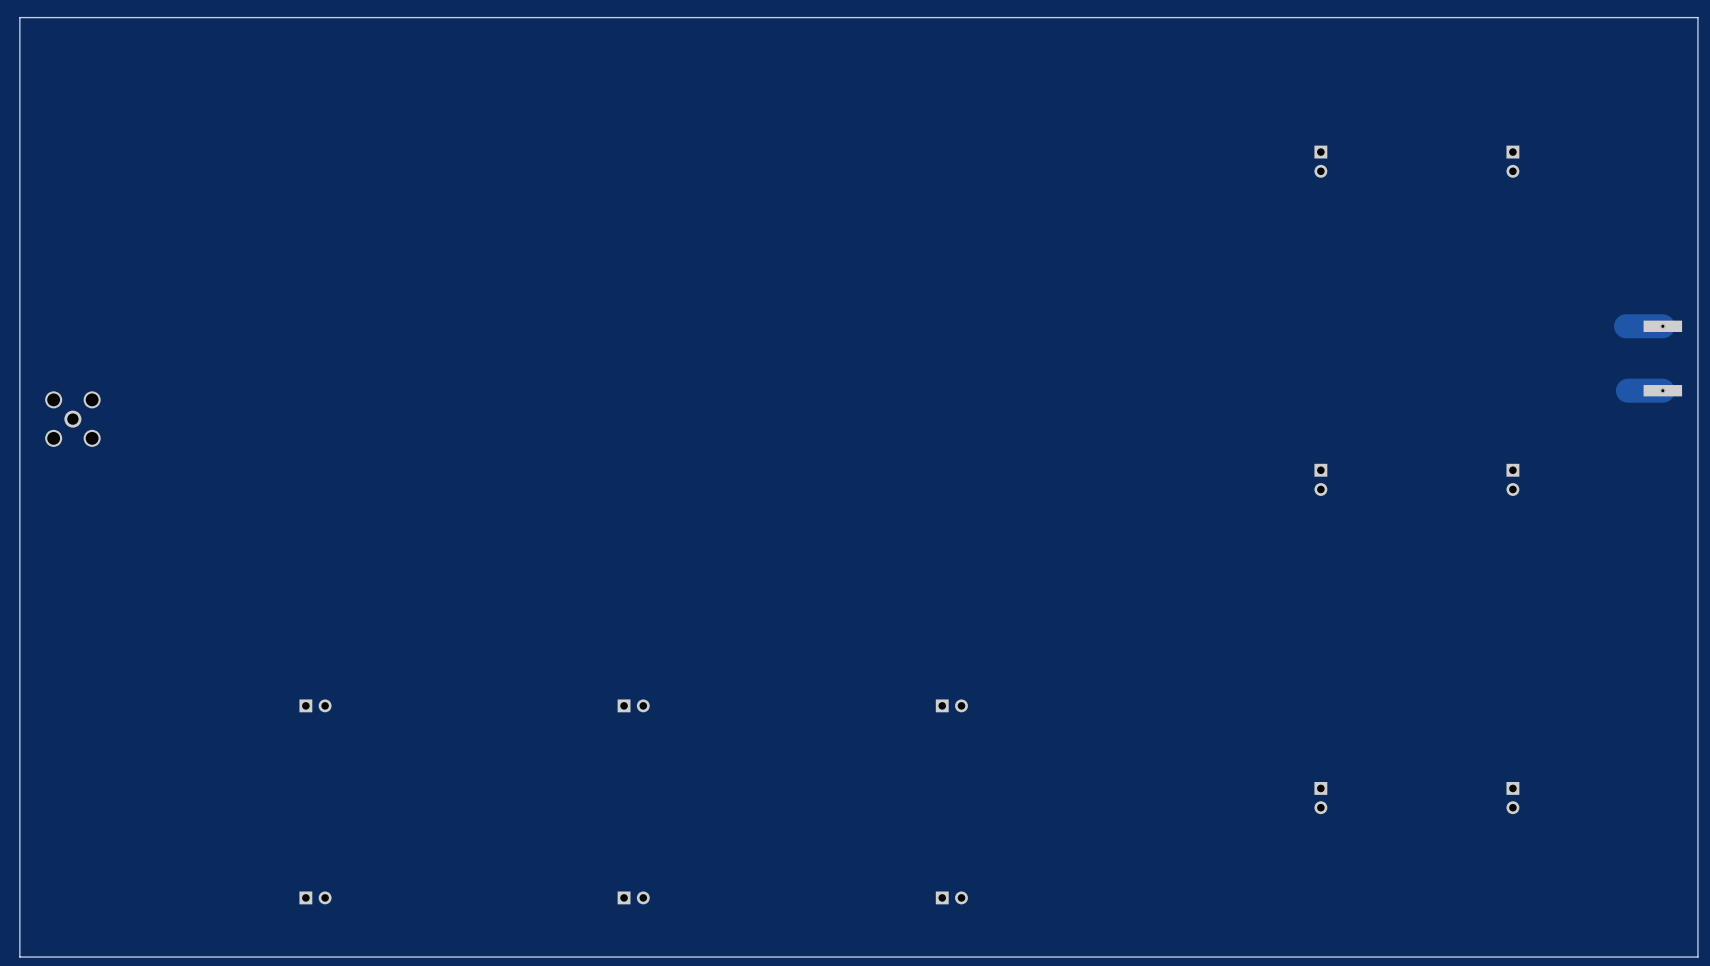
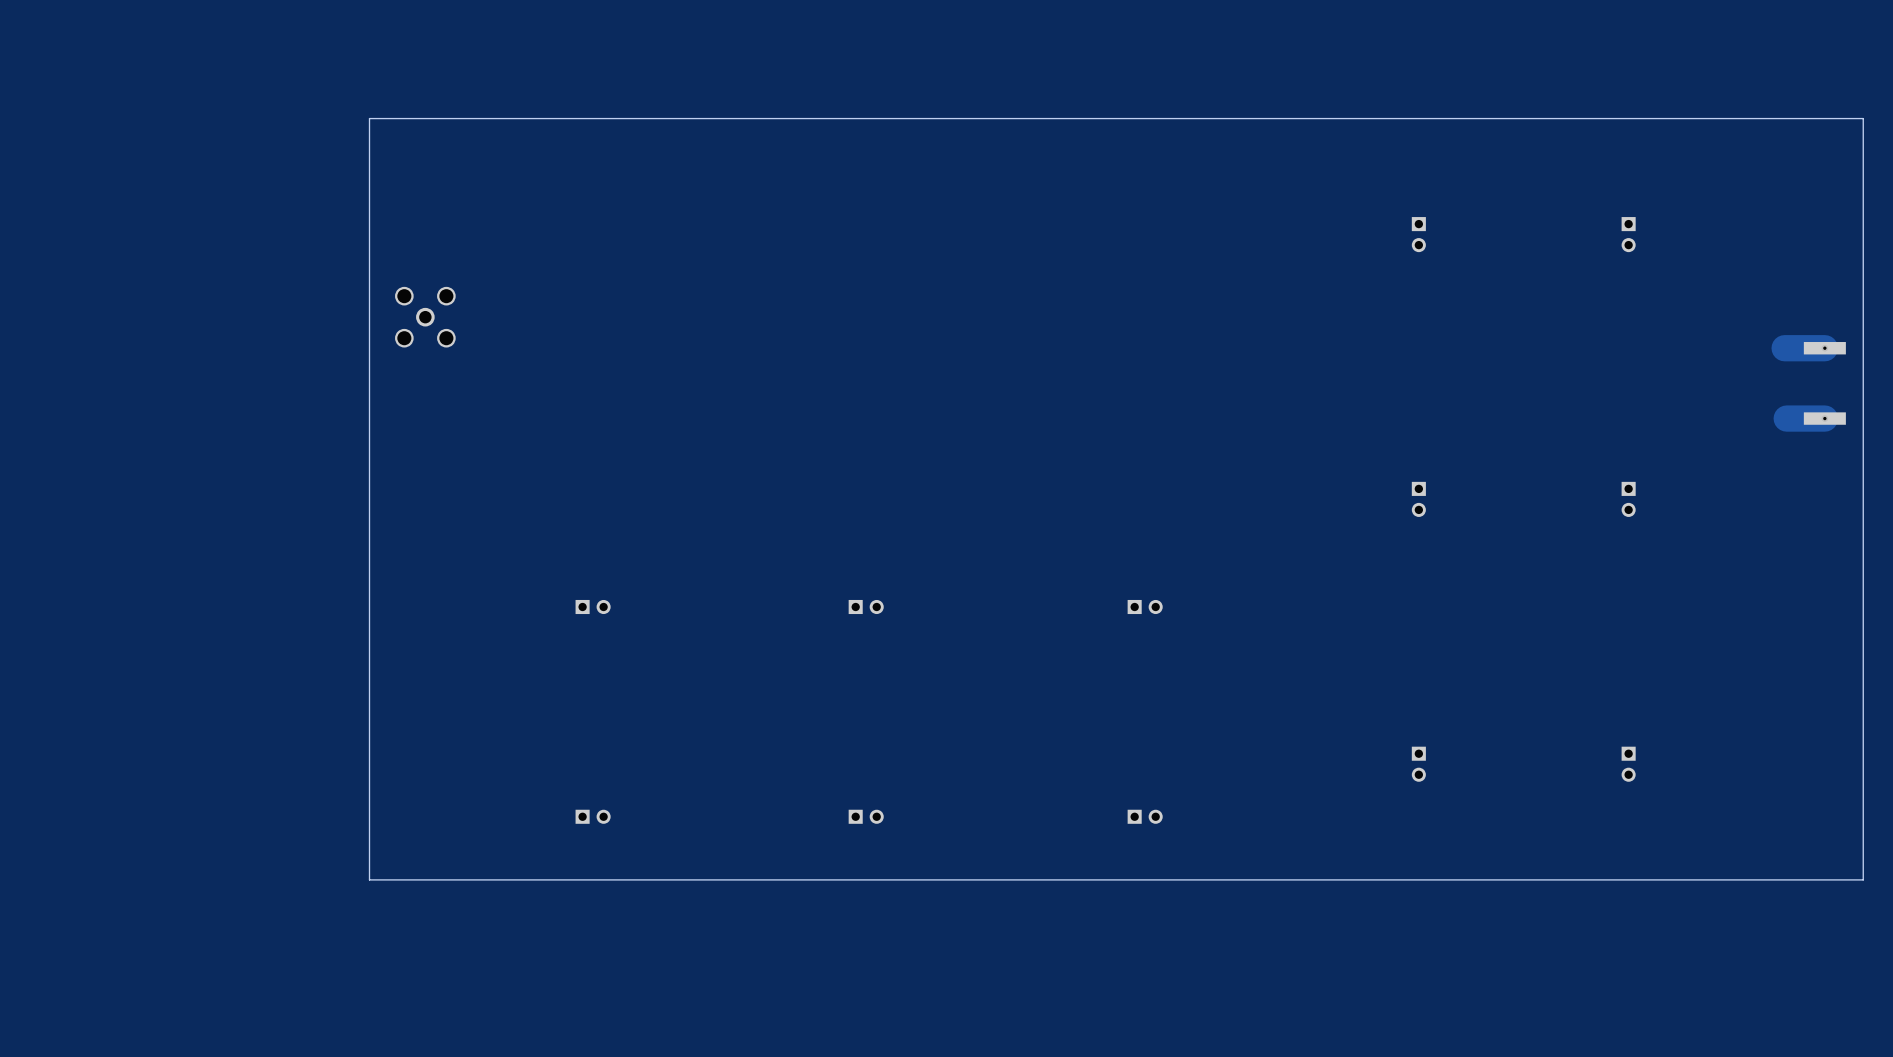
board edge: (1697, 116) (1697, 17) (19, 17) (19, 957) (1697, 957) (1697, 813) -> (1863, 118) (369, 118) (369, 879) (1863, 879)
part position: (1320, 161) -> (1418, 234)
part position: (1512, 161) -> (1628, 234)
part: none -> (425, 317)
part: (72, 419) -> none
part position: (1320, 479) -> (1418, 499)
part position: (1512, 479) -> (1628, 499)
part: none -> (593, 607)
part: none -> (866, 607)
part: none -> (1145, 607)
part: (315, 705) -> none
part: (633, 705) -> none
part: (951, 705) -> none
part: none -> (1418, 764)
part: none -> (1628, 764)
part: none -> (593, 816)
part: none -> (866, 816)
part: none -> (1145, 816)
part: (1320, 798) -> none
part: (1512, 798) -> none
part: (315, 897) -> none
part: (633, 897) -> none
part: (951, 897) -> none

